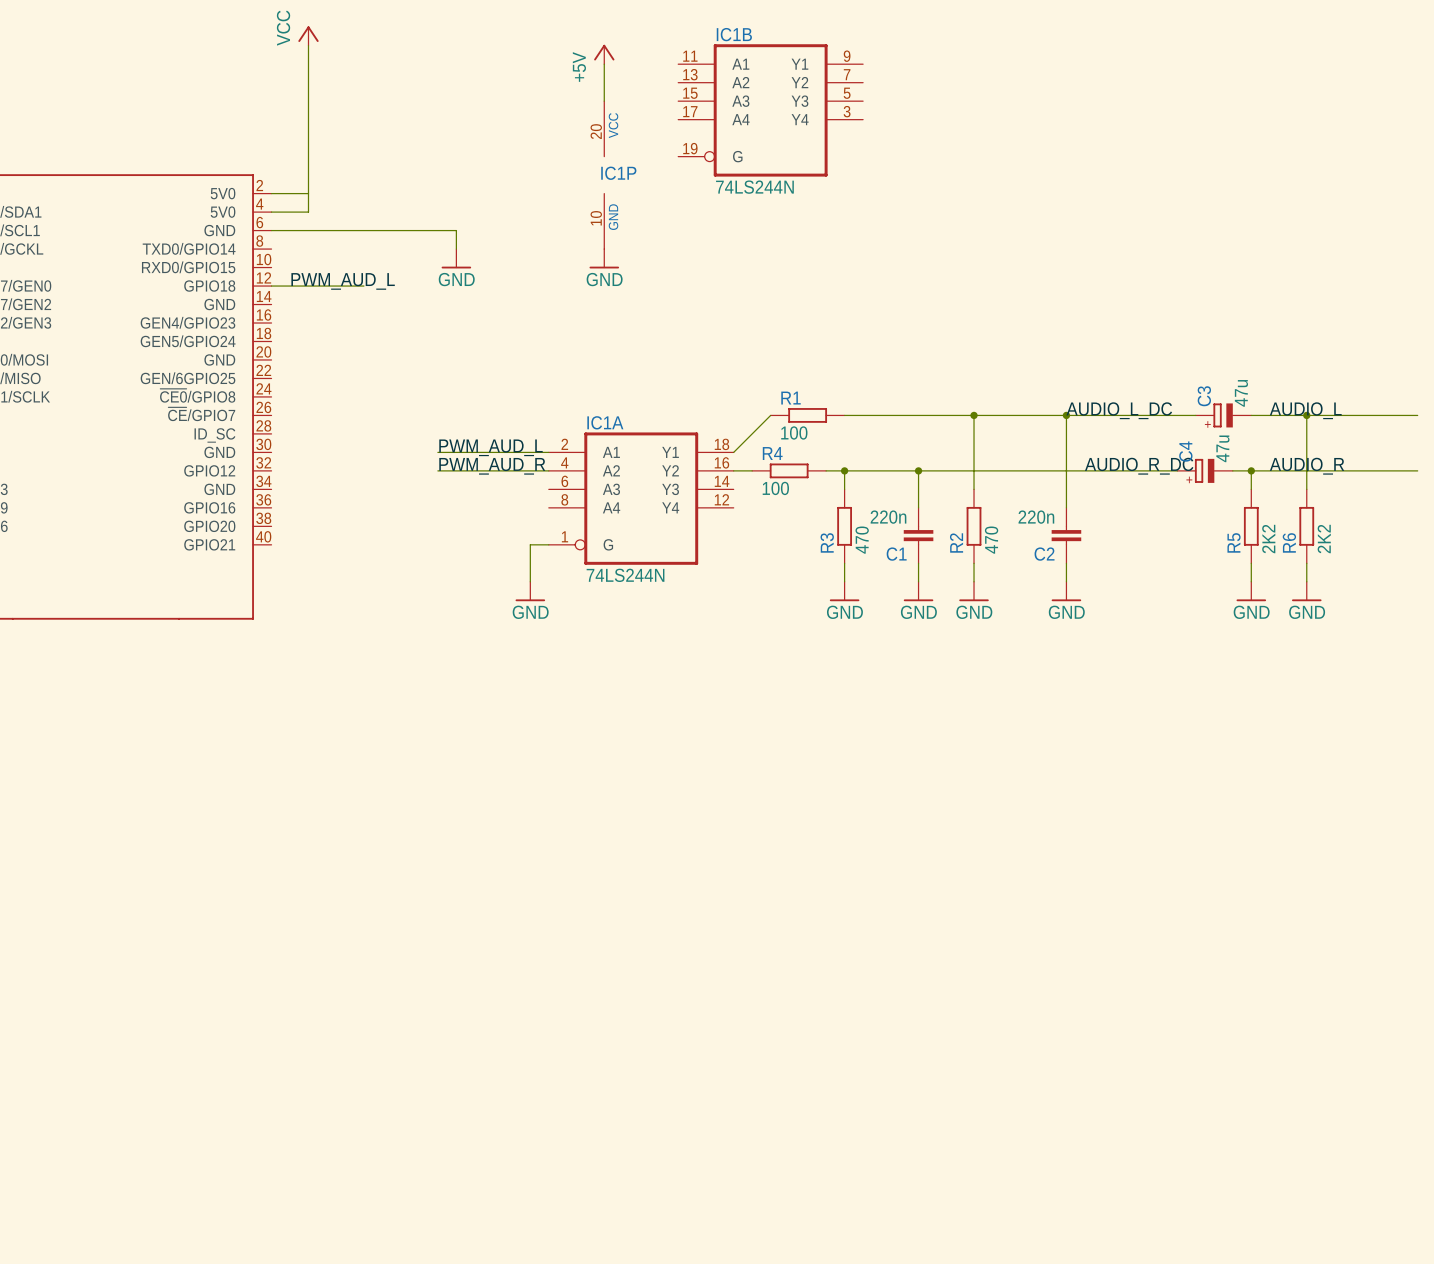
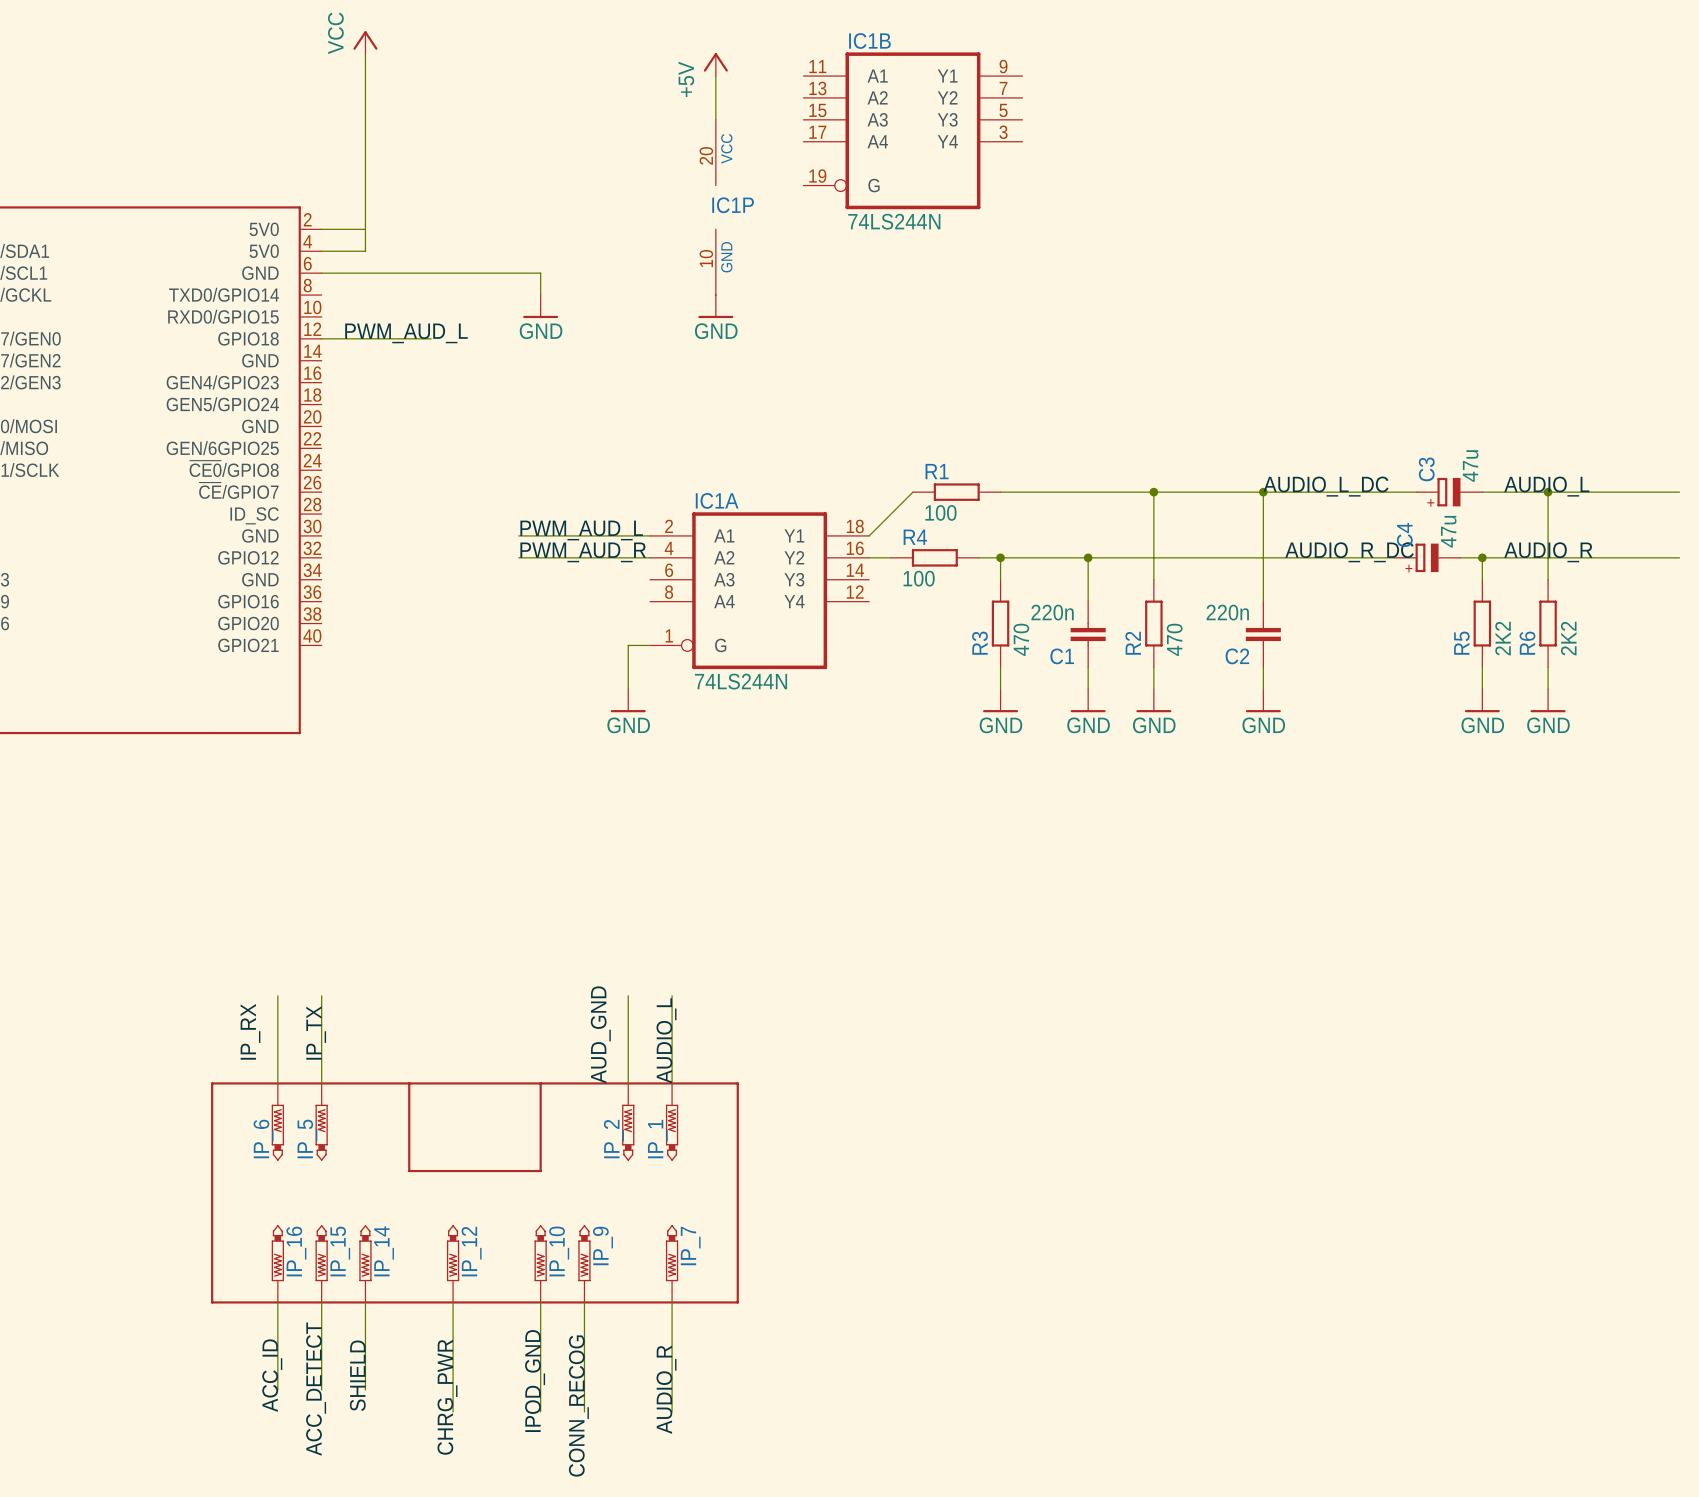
wire: none -> (277, 995) (277, 1083)
wire: none -> (321, 995) (321, 1083)
wire: none -> (628, 995) (628, 1083)
wire: none -> (672, 995) (672, 1083)
label: none -> IP_RX (250, 1031)
label: none -> IP_TX (316, 1032)
label: none -> AUD_GND (600, 1034)
label: none -> AUDIO_L (666, 1040)
line: none -> (212, 1083) (212, 1302) (737, 1302) (737, 1083) (212, 1083)
line: none -> (409, 1083) (409, 1171) (540, 1171) (540, 1083)
IP_6: none -> (277, 1122)
IP_5: none -> (321, 1122)
IP_2: none -> (628, 1122)
IP_1: none -> (672, 1122)
IP_16: none -> (277, 1263)
IP_15: none -> (321, 1263)
IP_14: none -> (365, 1263)
IP_12: none -> (453, 1263)
IP_10: none -> (540, 1263)
IP_9: none -> (584, 1263)
IP_7: none -> (672, 1263)
wire: none -> (277, 1302) (277, 1390)
wire: none -> (321, 1302) (321, 1390)
wire: none -> (365, 1302) (365, 1390)
wire: none -> (453, 1302) (453, 1411)
wire: none -> (540, 1302) (540, 1411)
wire: none -> (584, 1302) (584, 1411)
wire: none -> (672, 1302) (672, 1411)
label: none -> ACC_ID (272, 1375)
label: none -> SHIELD (357, 1375)
label: none -> IPOD_GND (535, 1381)
label: none -> ACC_DETECT (316, 1389)
label: none -> AUDIO_R (666, 1389)
label: none -> CHRG_PWR (447, 1397)
label: none -> CONN_RECOG (578, 1406)

